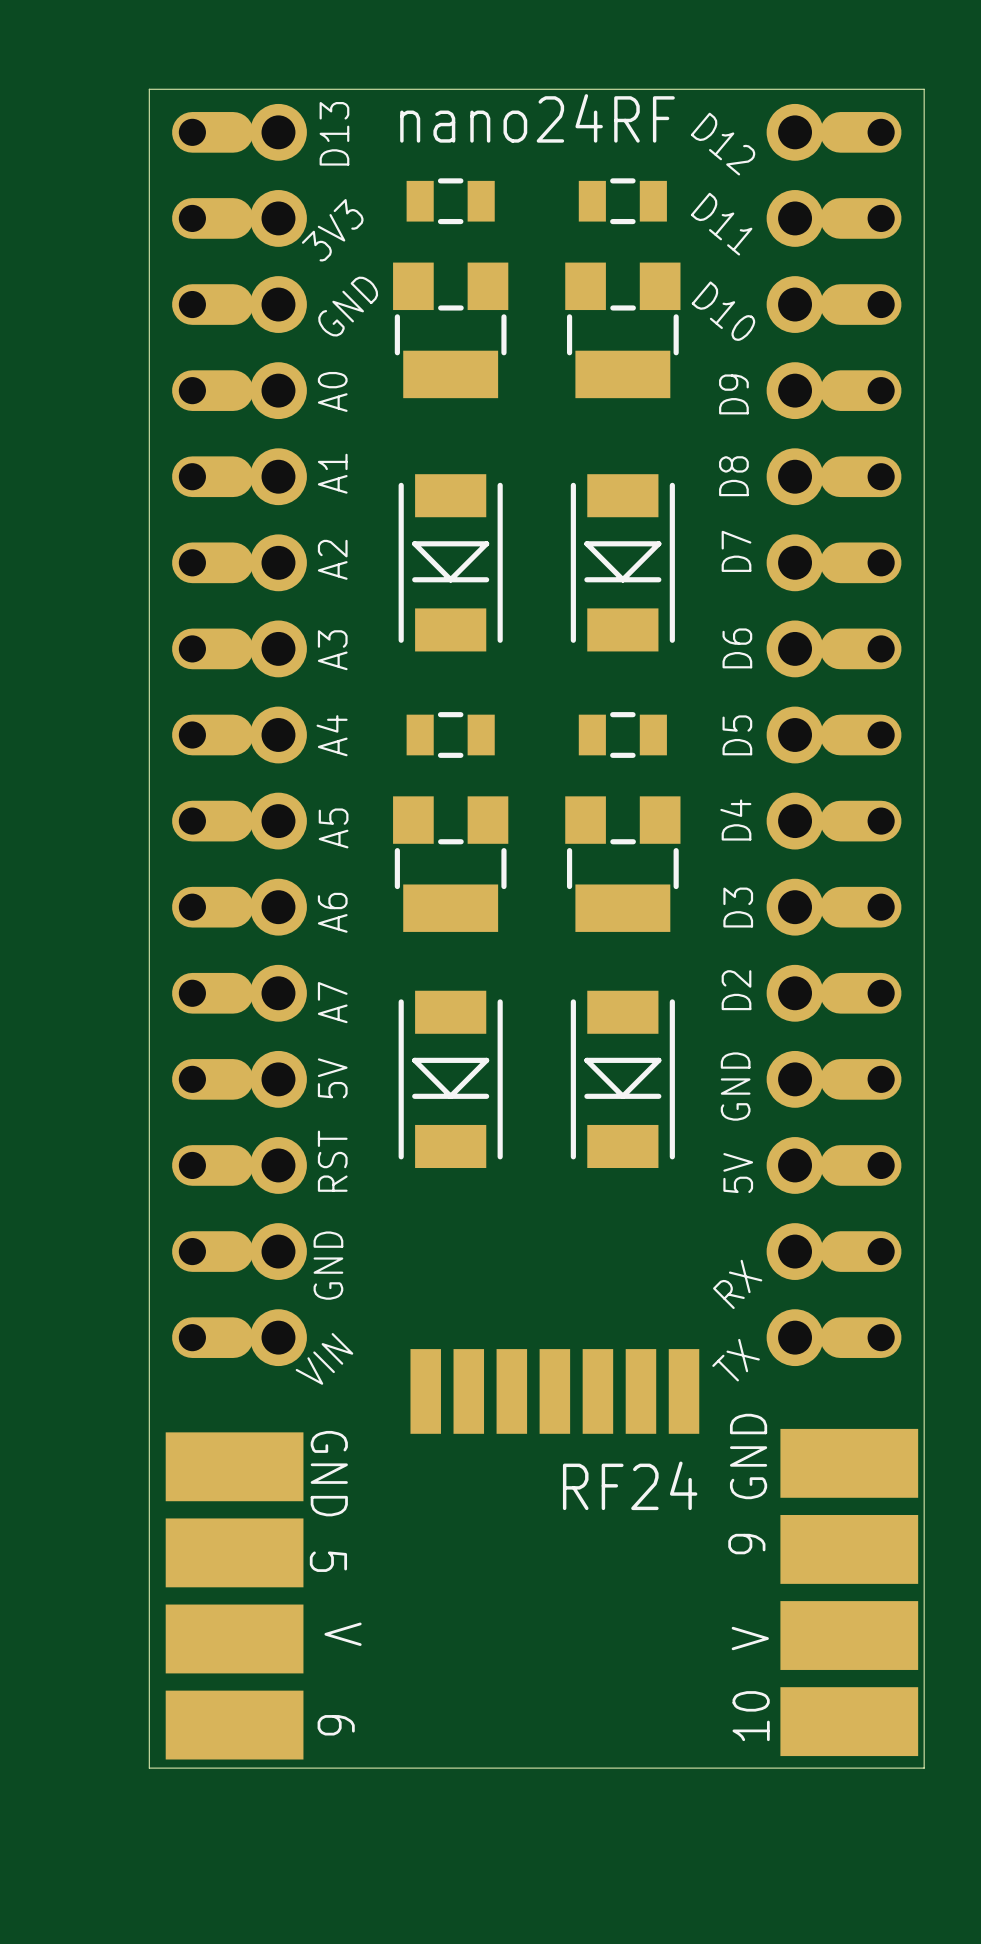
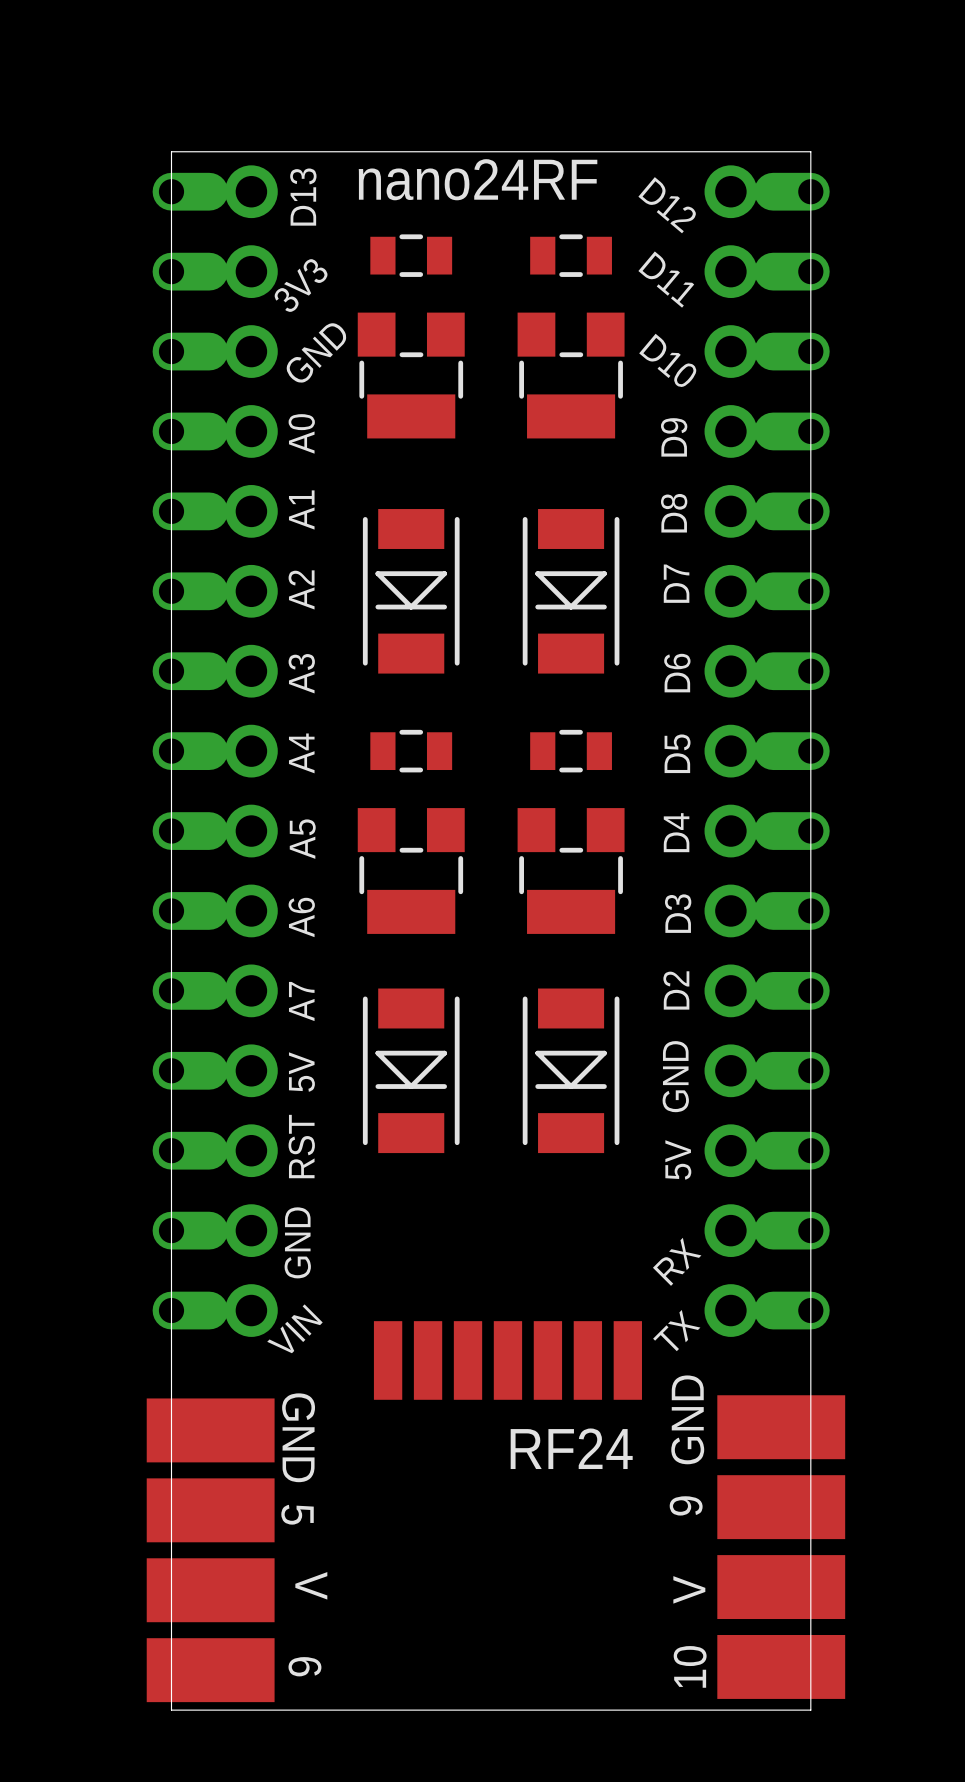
board edge: (192, 89) (149, 89) (149, 1768) (192, 1768) -> (171, 151) (171, 1710)
board edge: (881, 89) (924, 89) (924, 1768) (881, 1768) -> (810, 151) (810, 1710)

